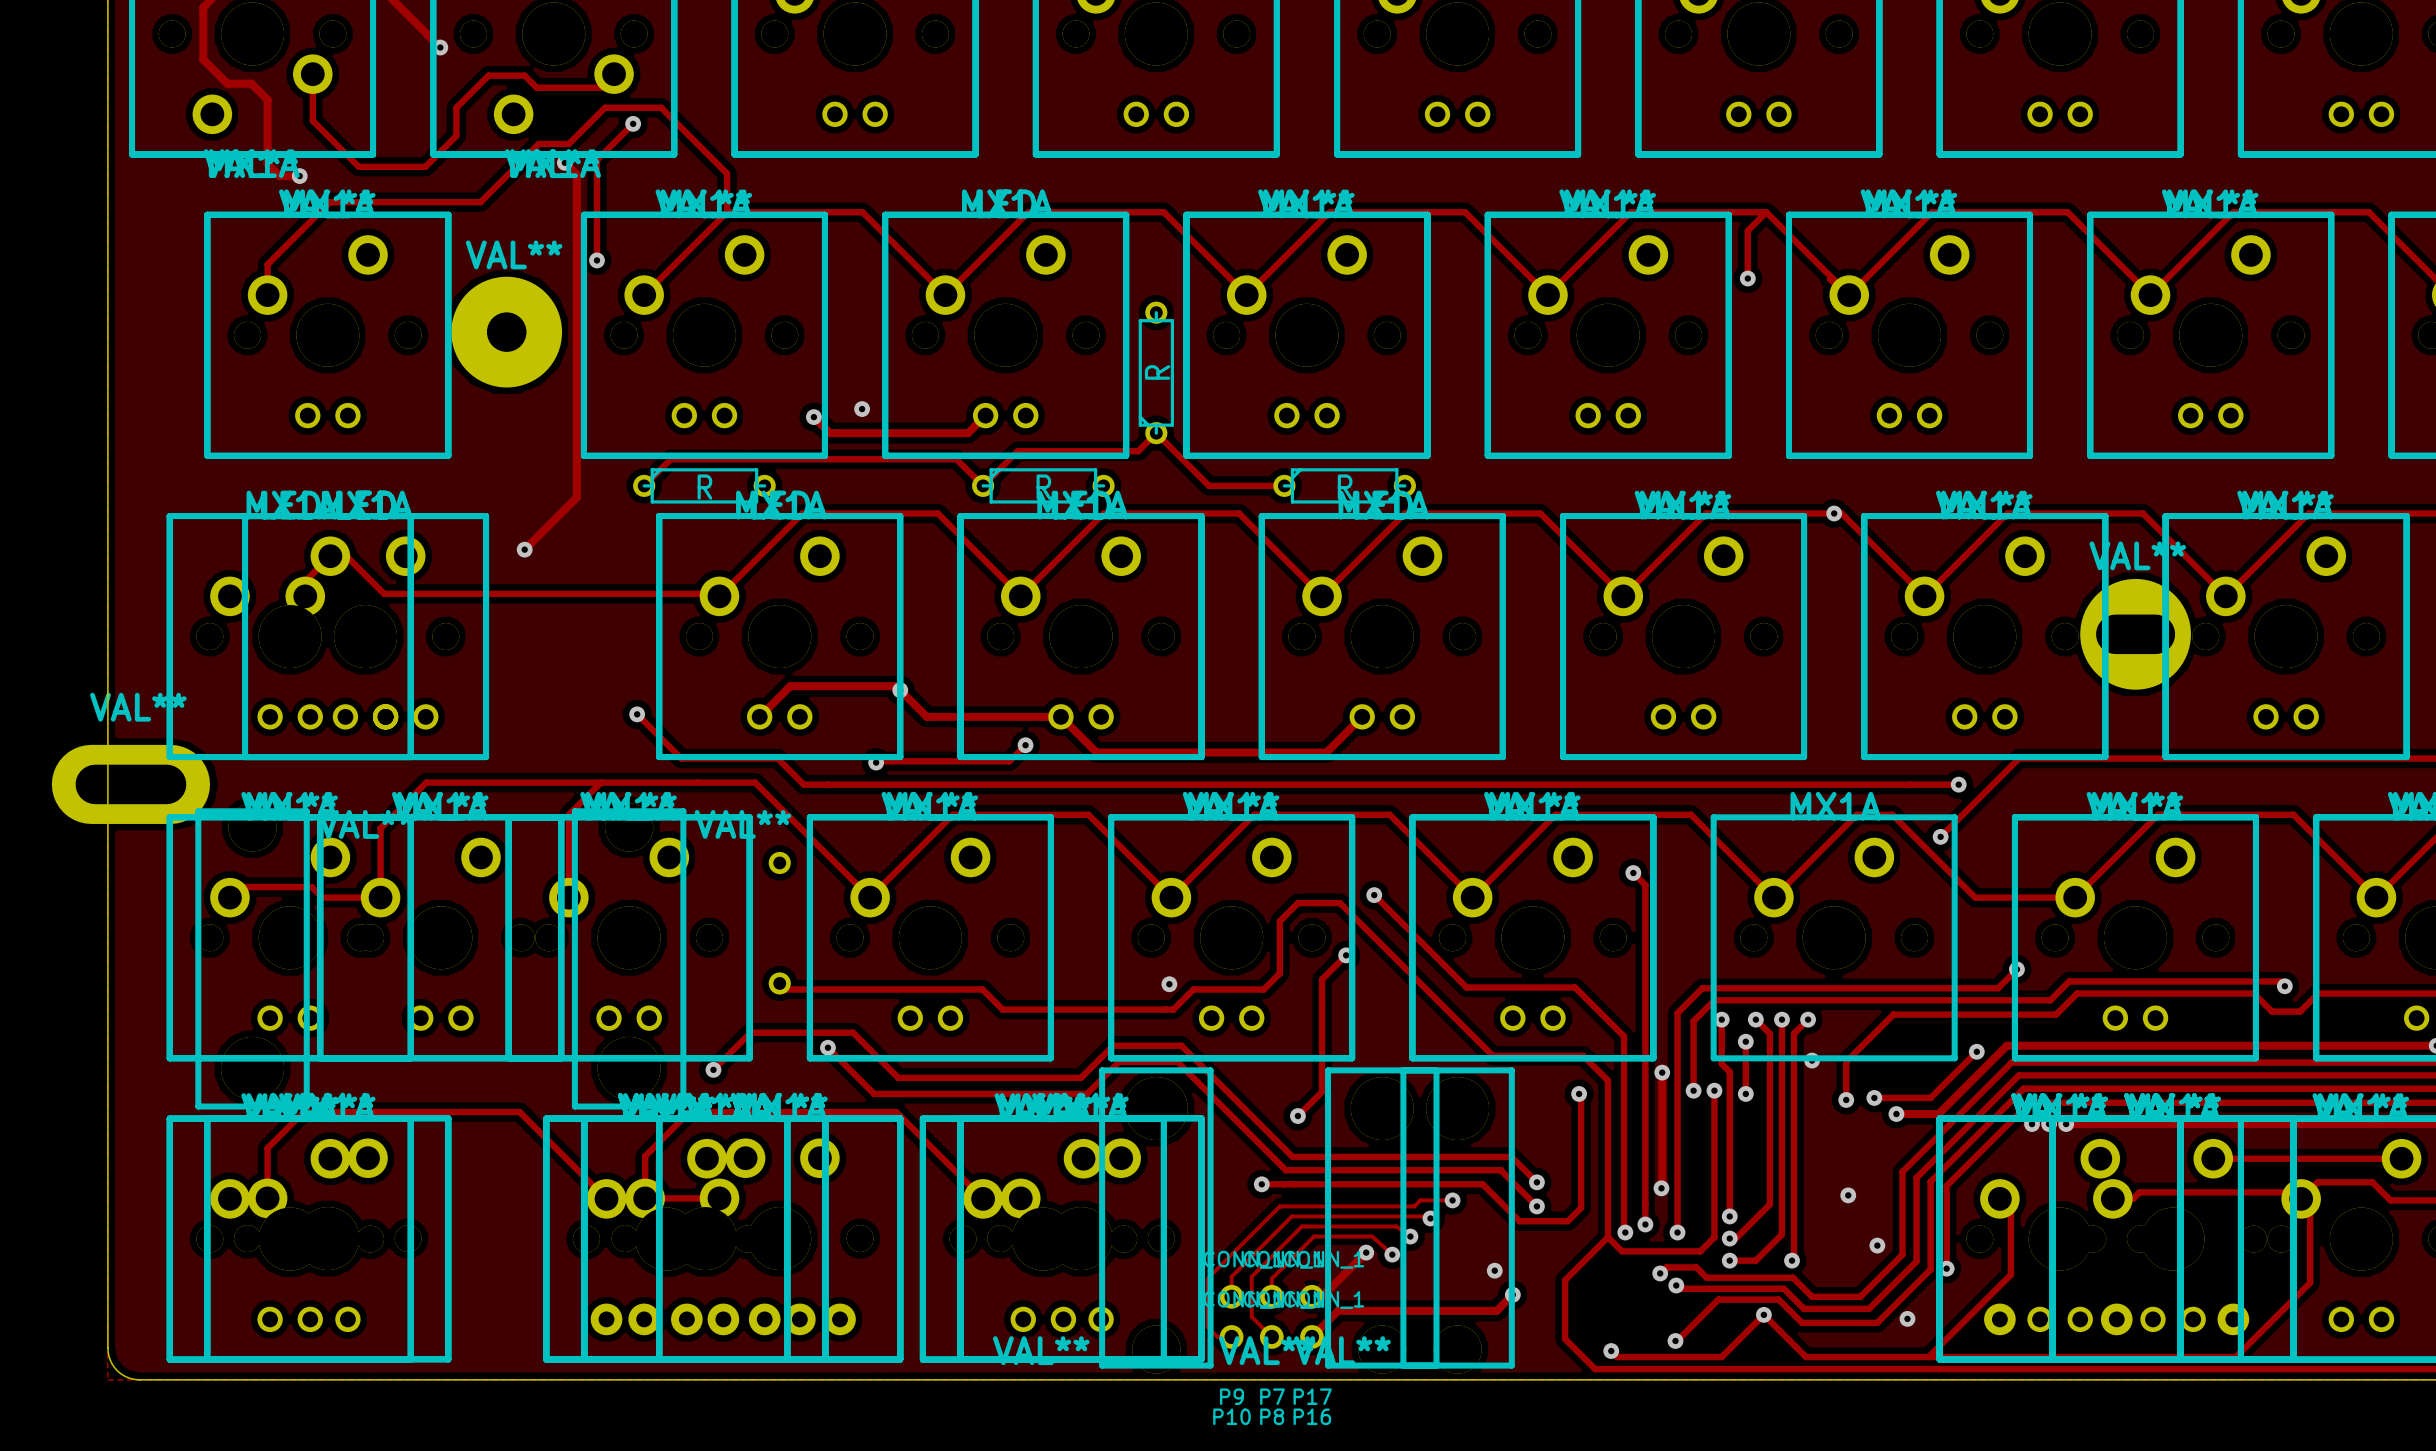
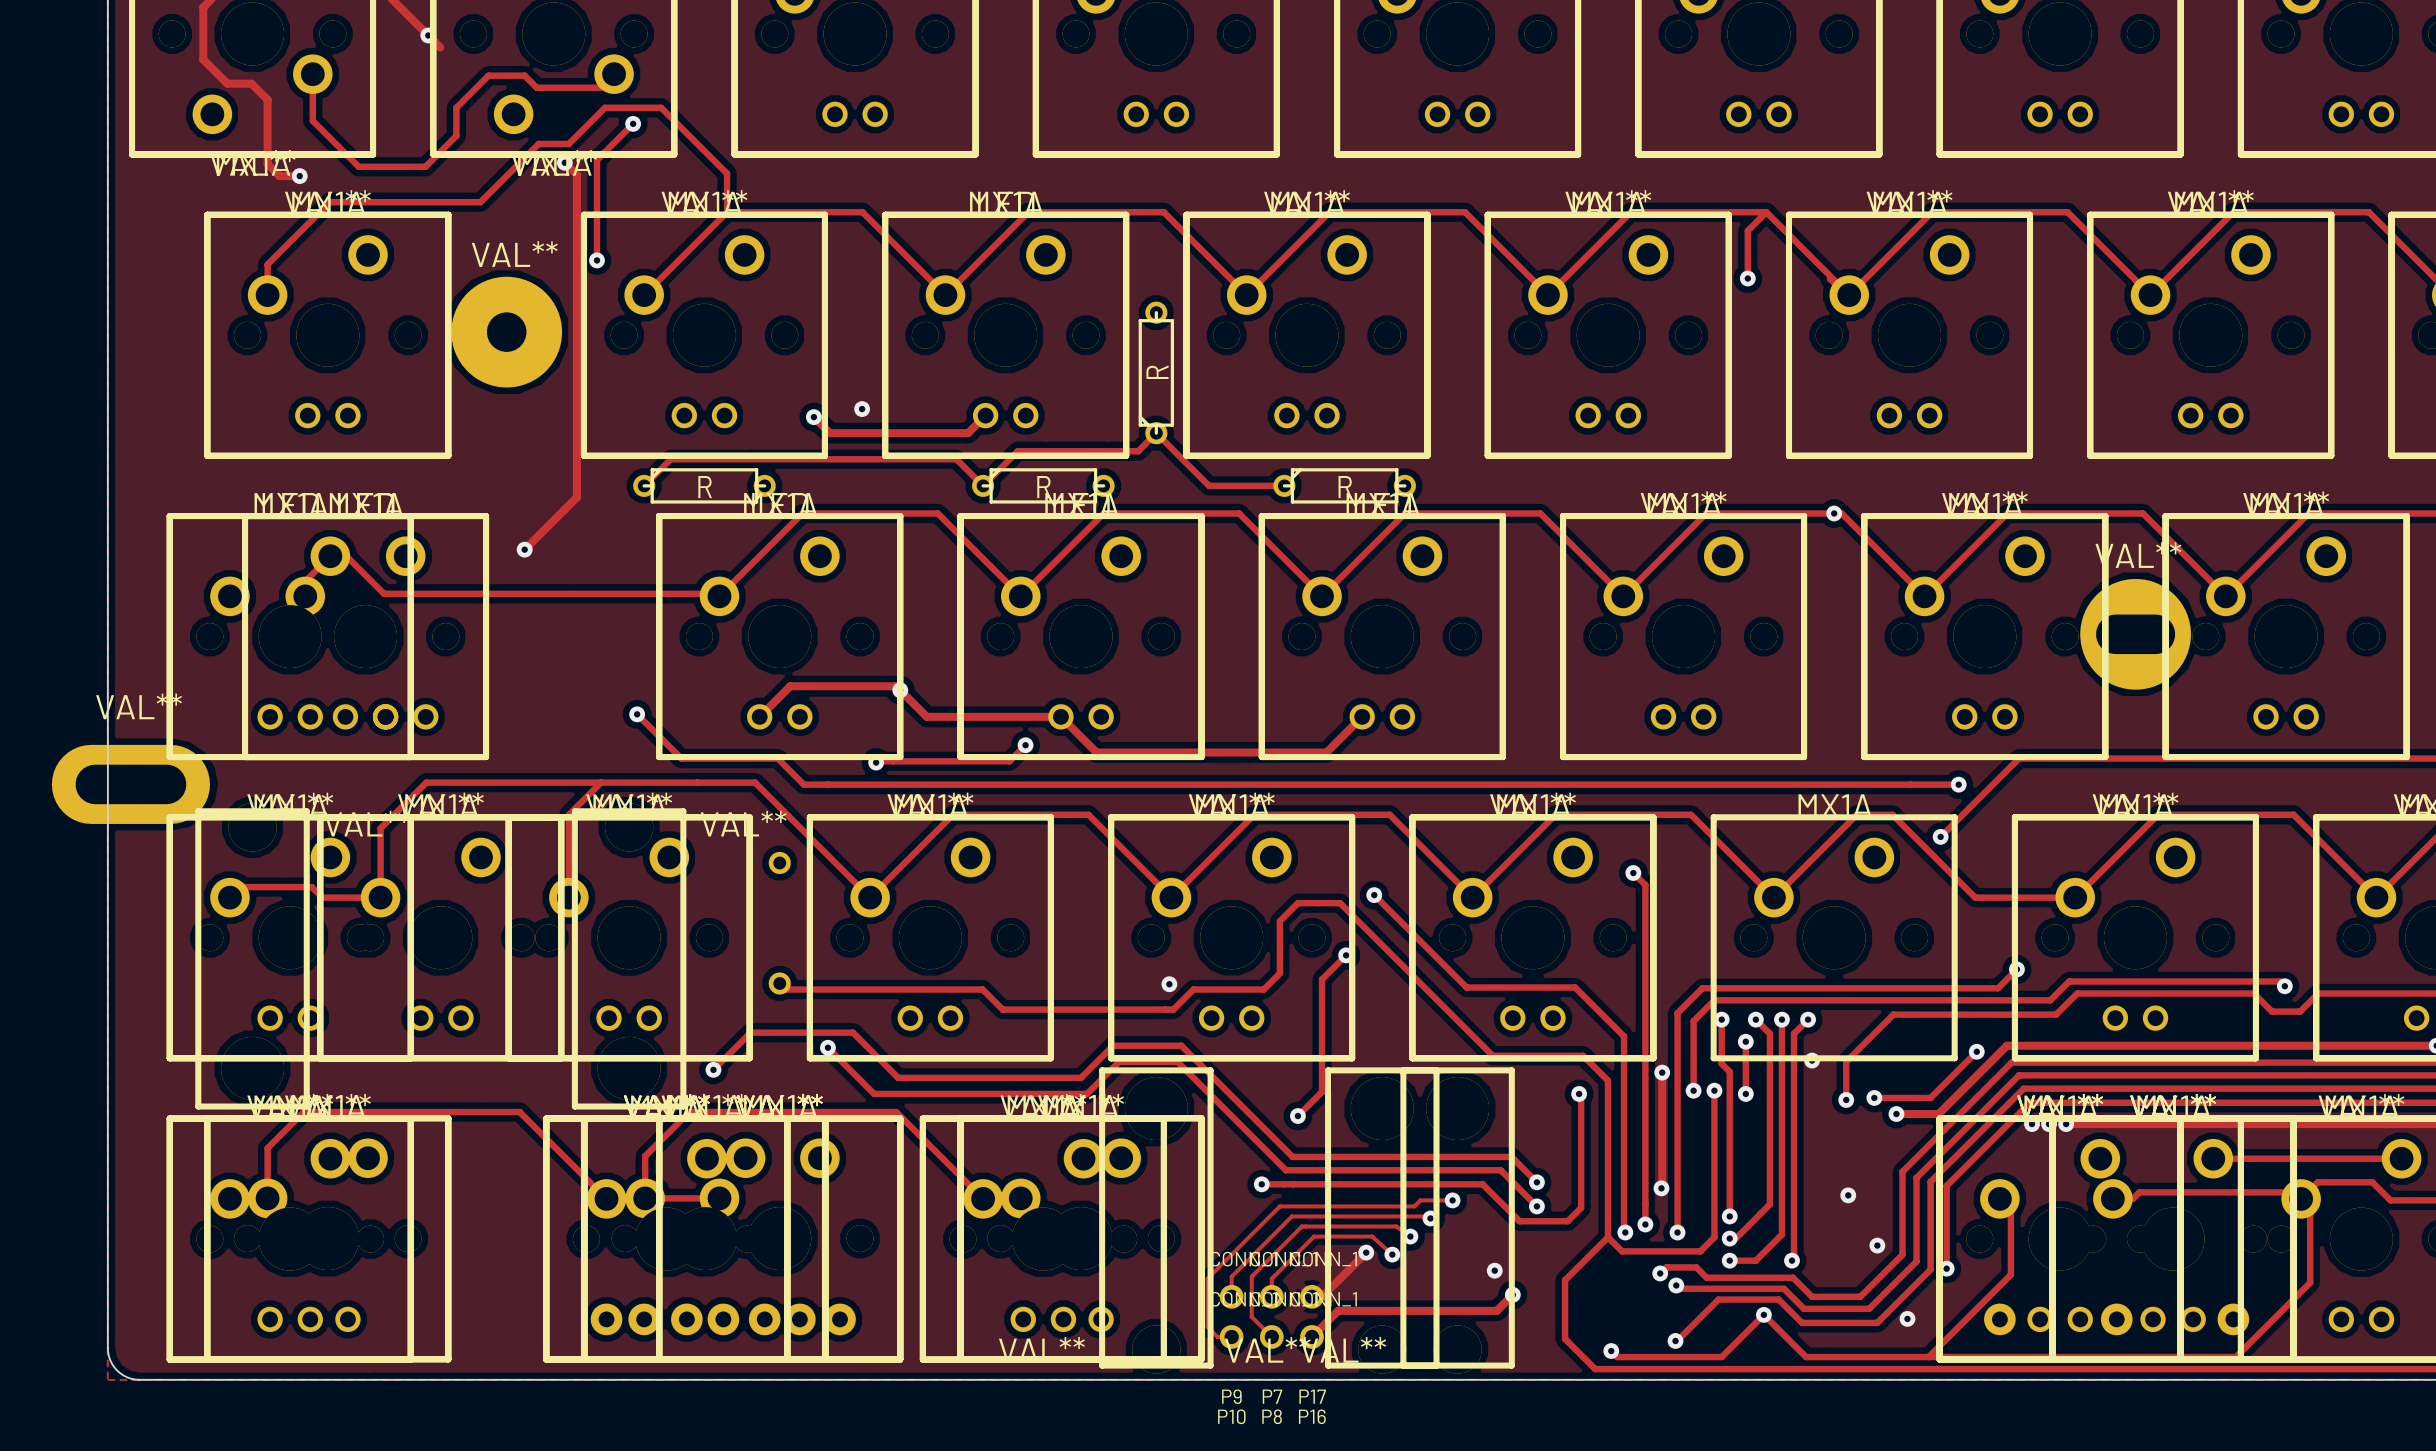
via position: (440, 47) -> (428, 35)

